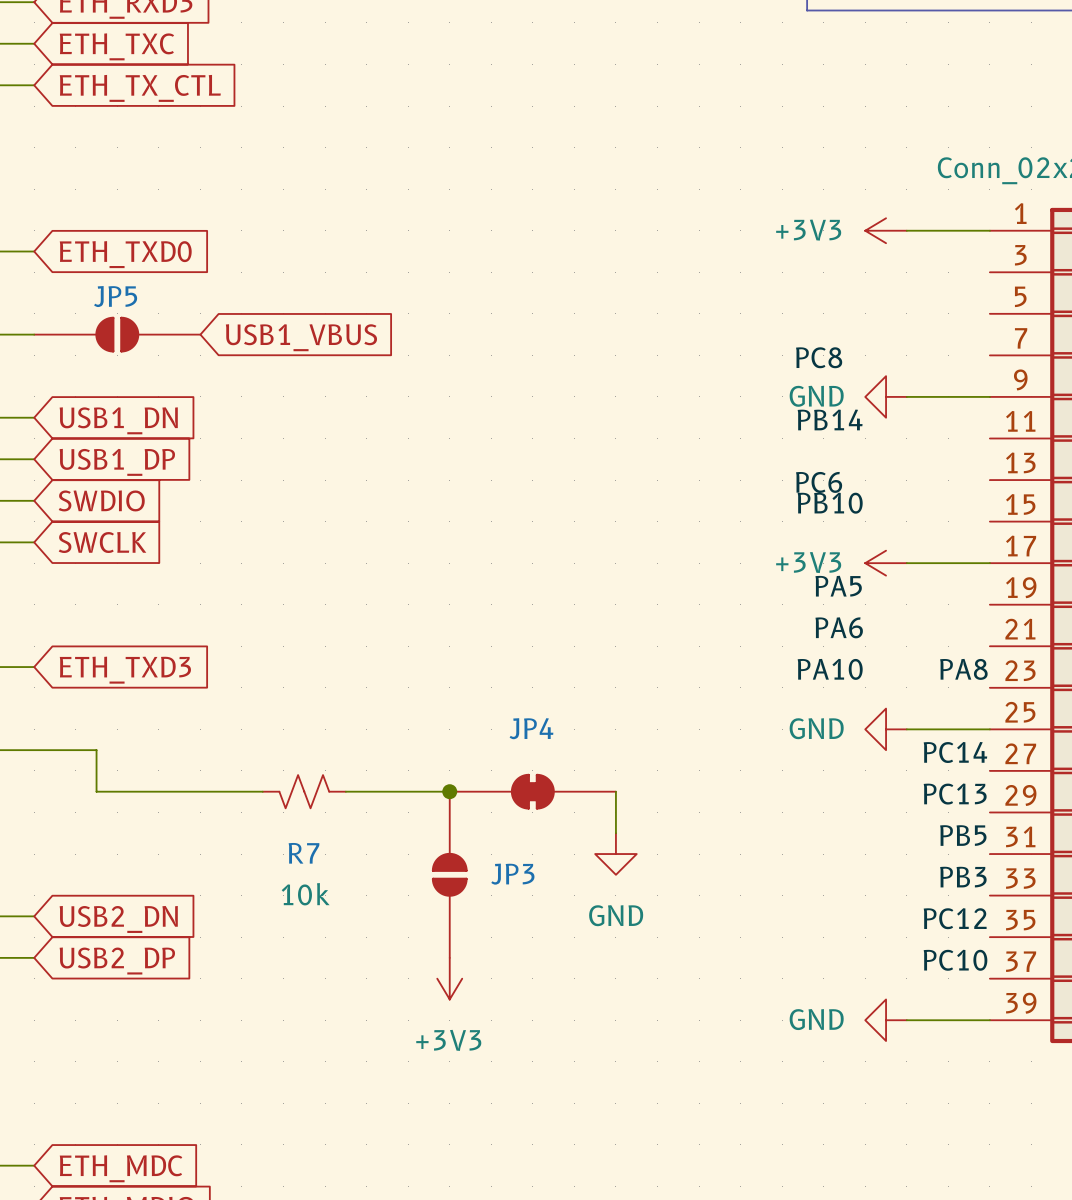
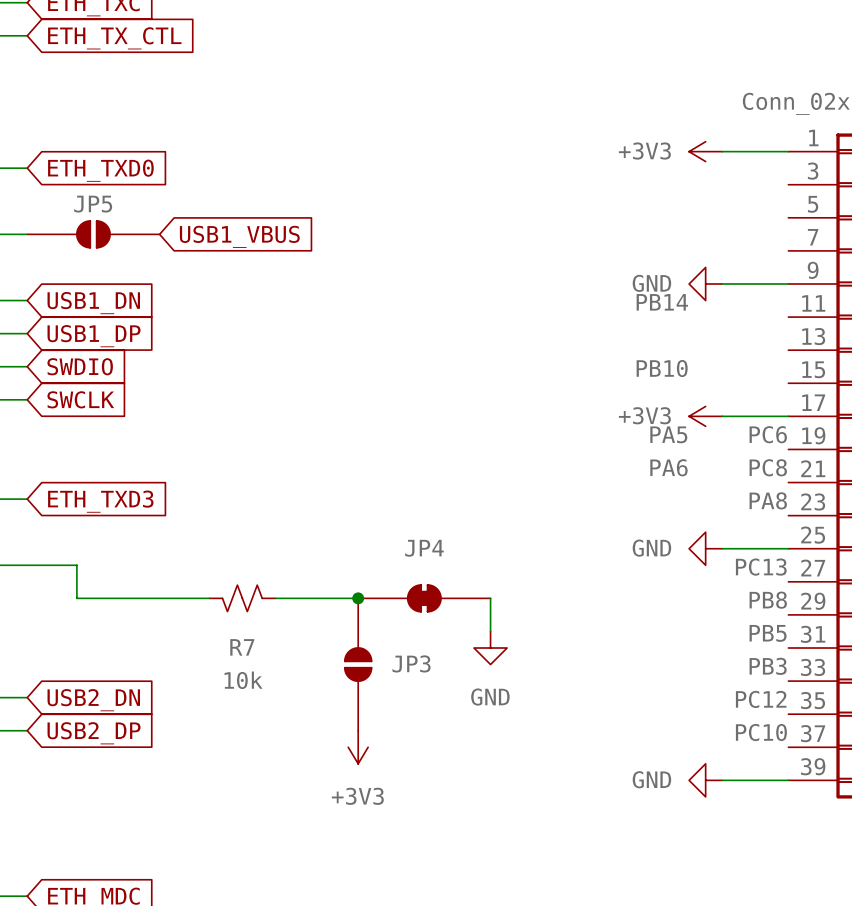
label position: PC8 (819, 357) -> PC8 (768, 467)
label position: PC6 (819, 482) -> PC6 (768, 434)
label: PA10 (830, 669) -> none
label: PC14 (955, 752) -> PC13 (761, 567)
label: PC13 (955, 794) -> PB8 (768, 600)

